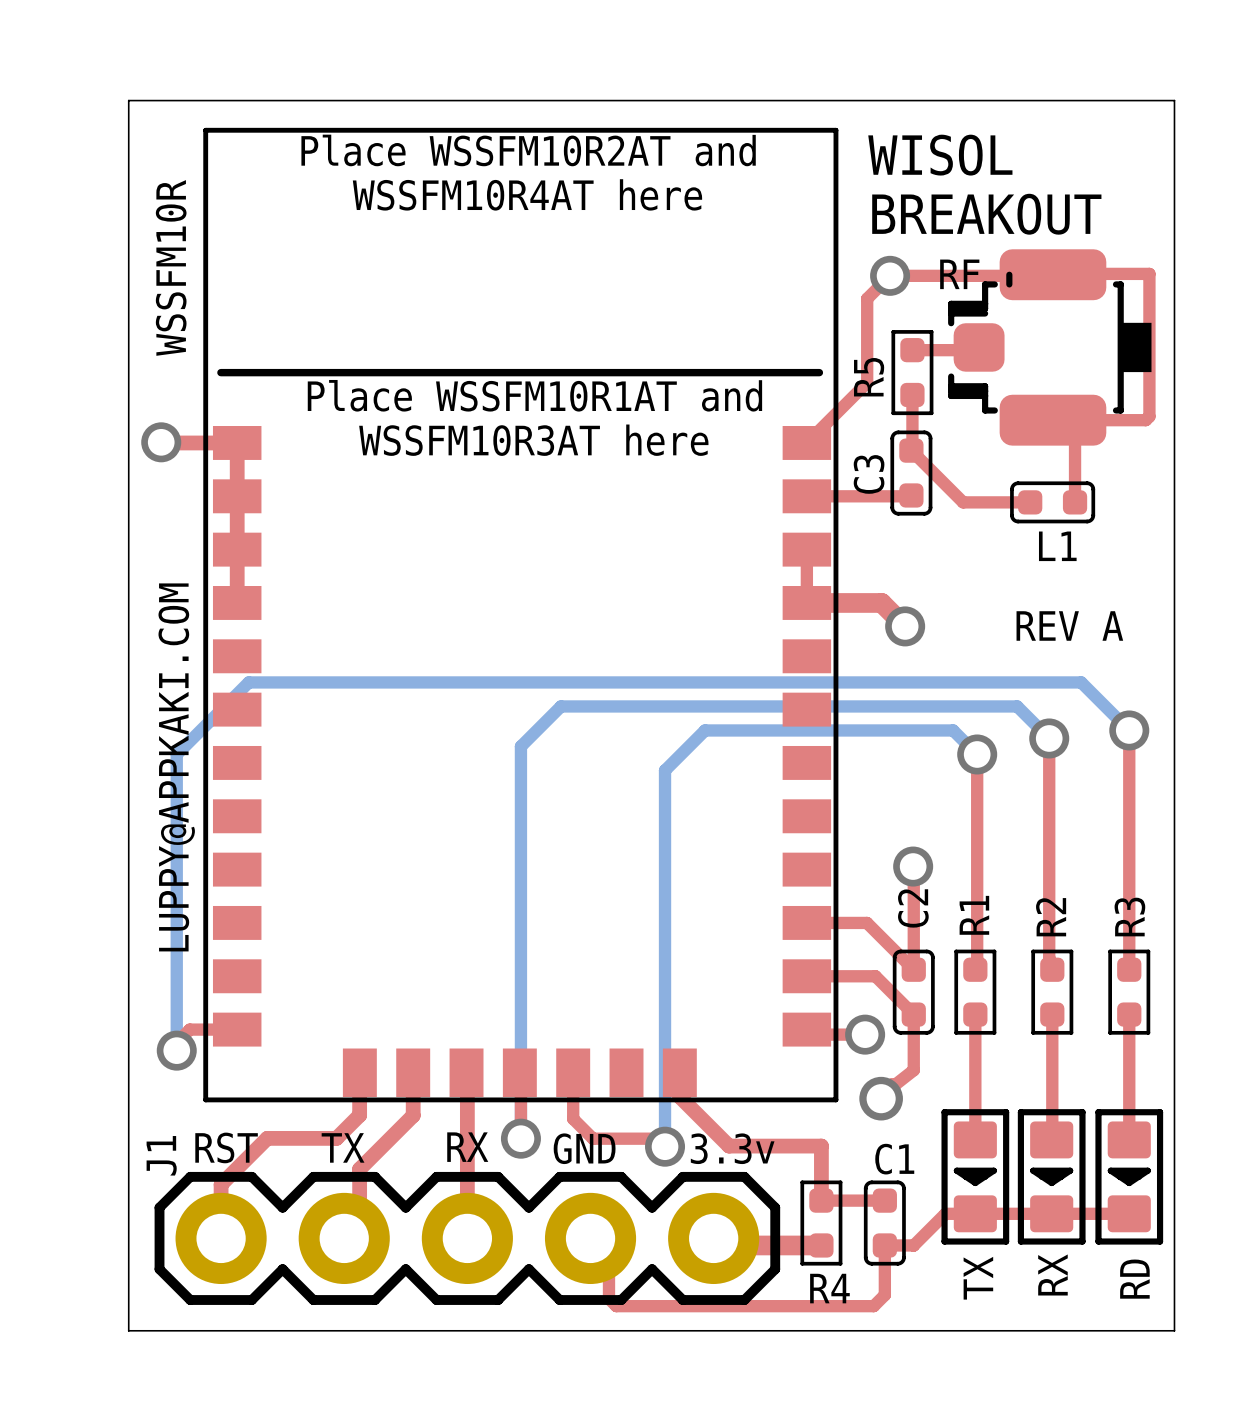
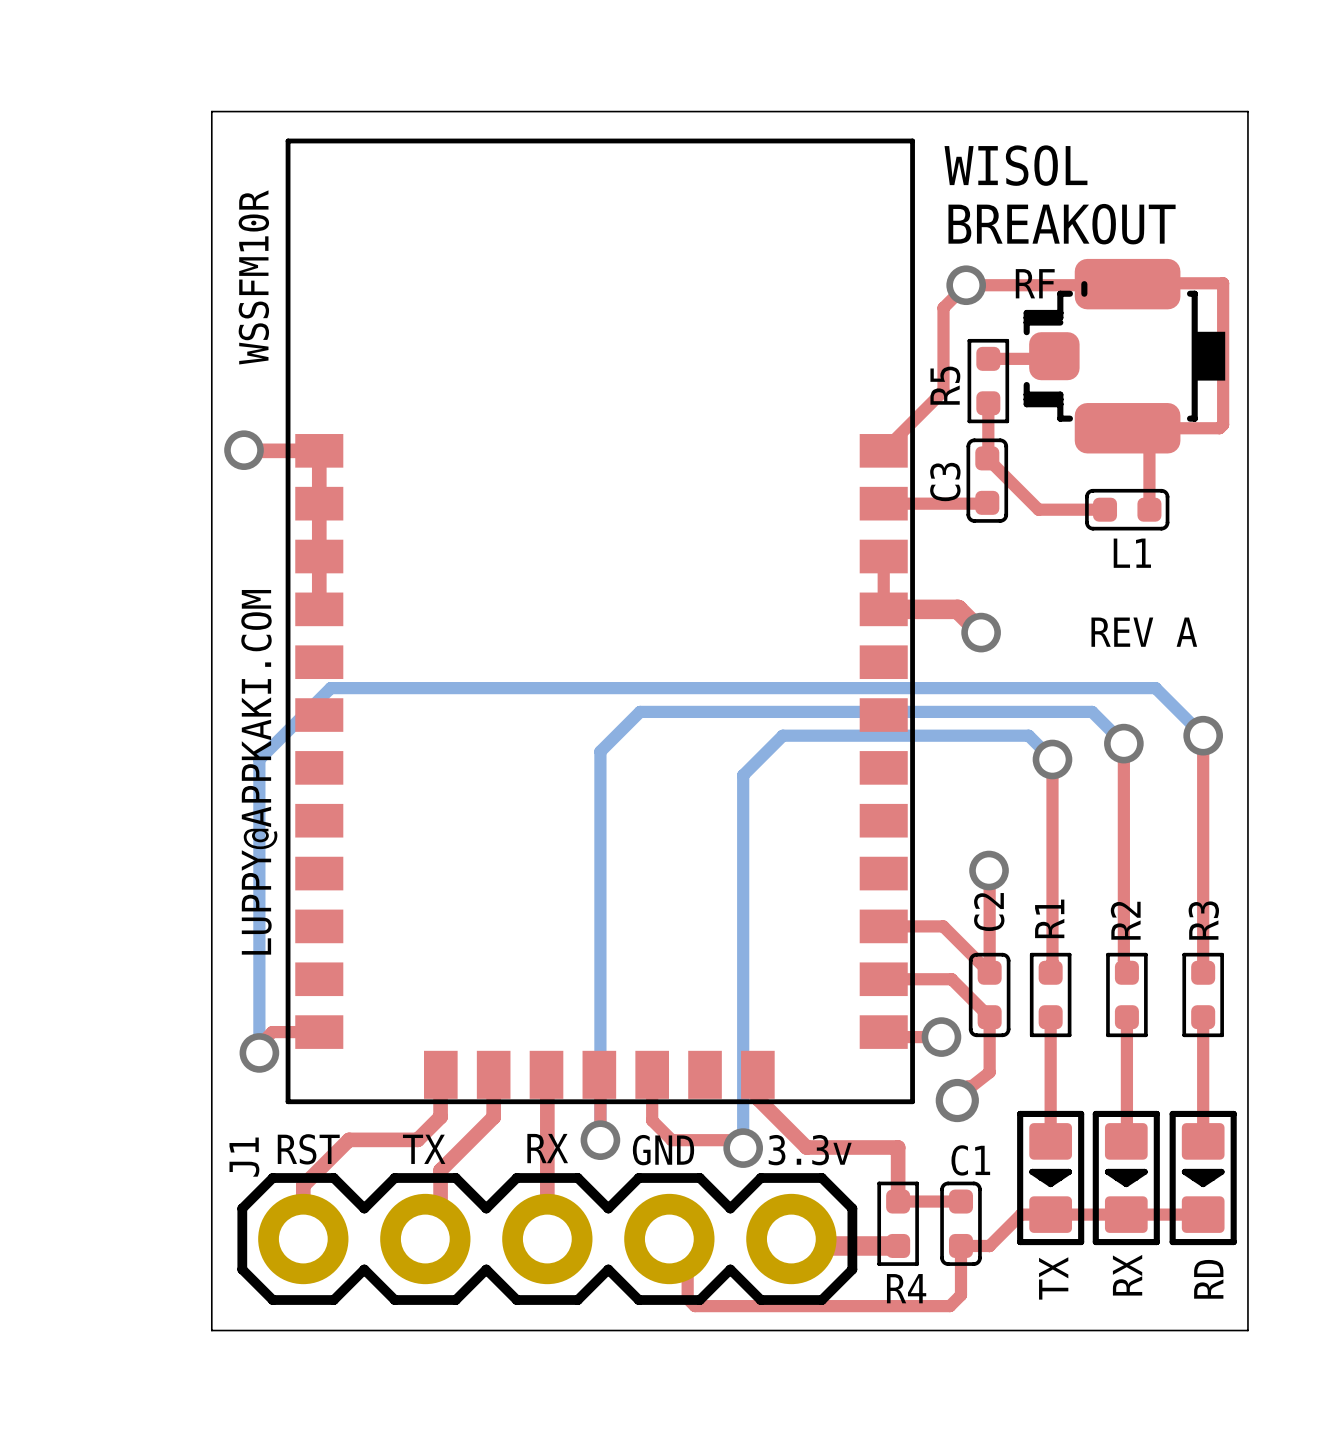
WSSFM10R footprint: [203, 127, 839, 1103] -> [285, 138, 915, 1105]

